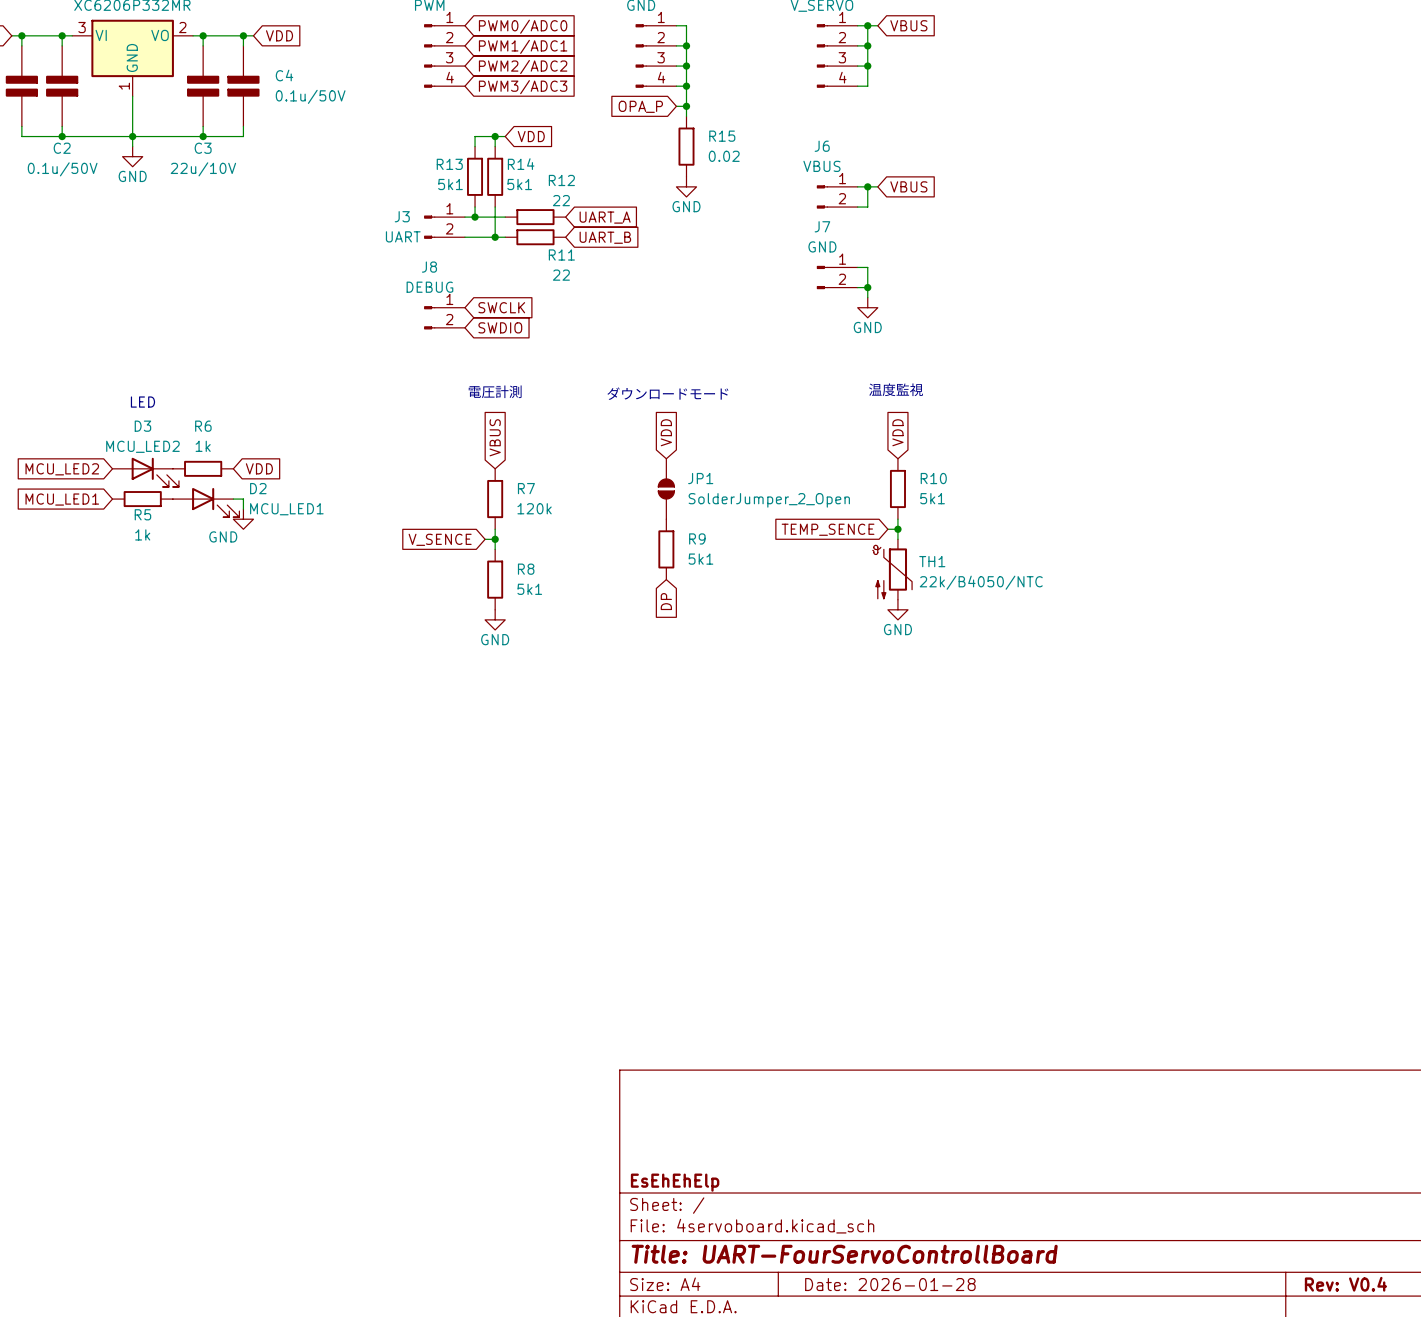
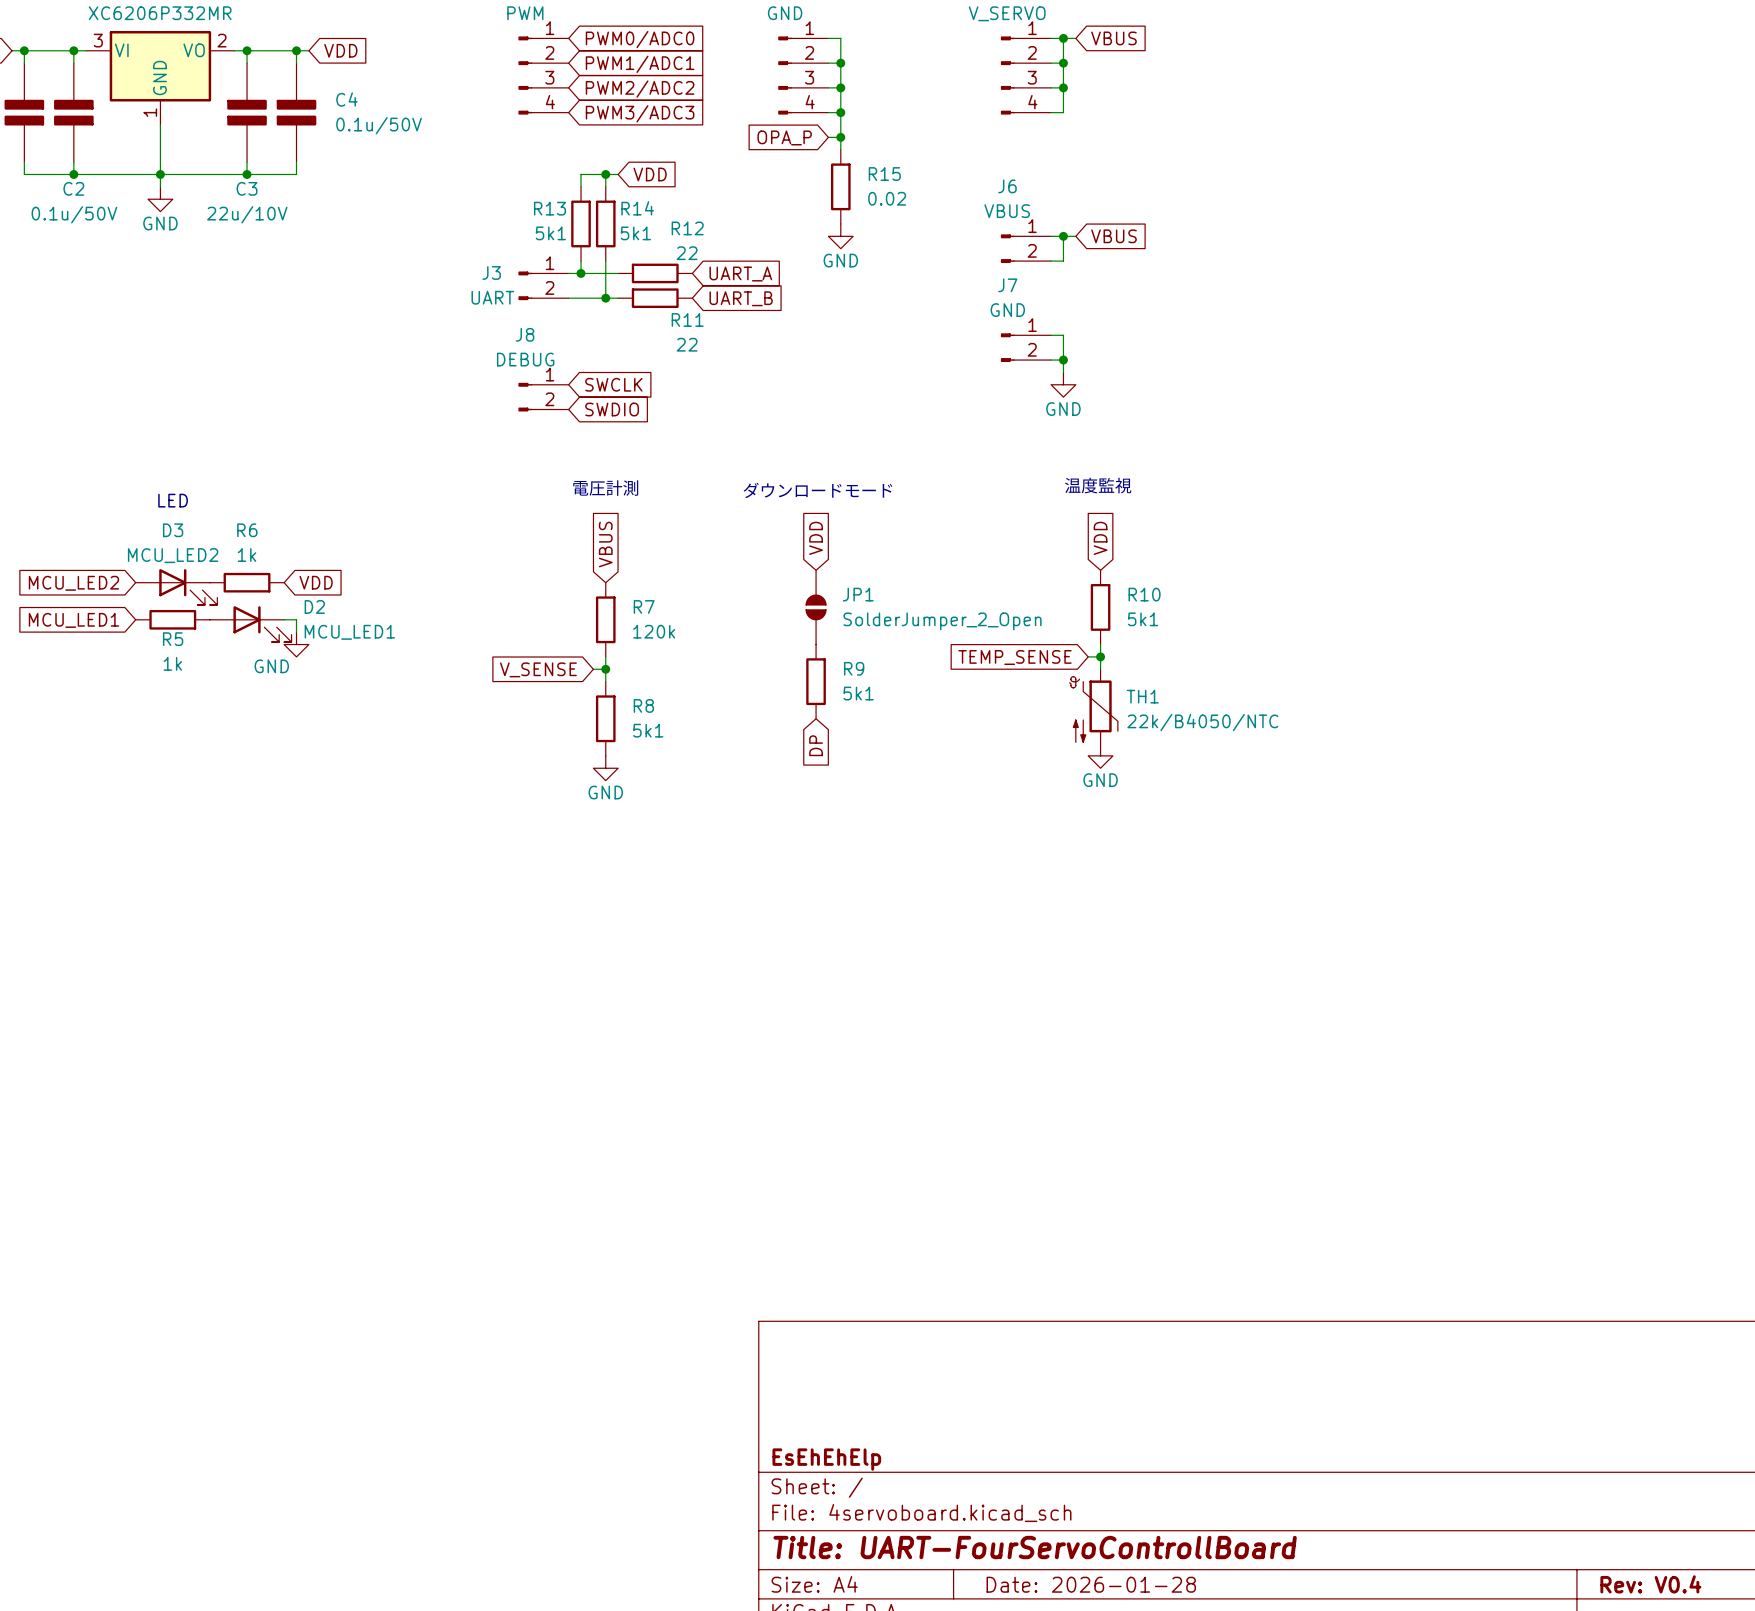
global label: TEMP_SENCE (828, 529) -> TEMP_SENSE (1014, 657)
global label: V_SENCE (440, 539) -> V_SENSE (538, 669)

